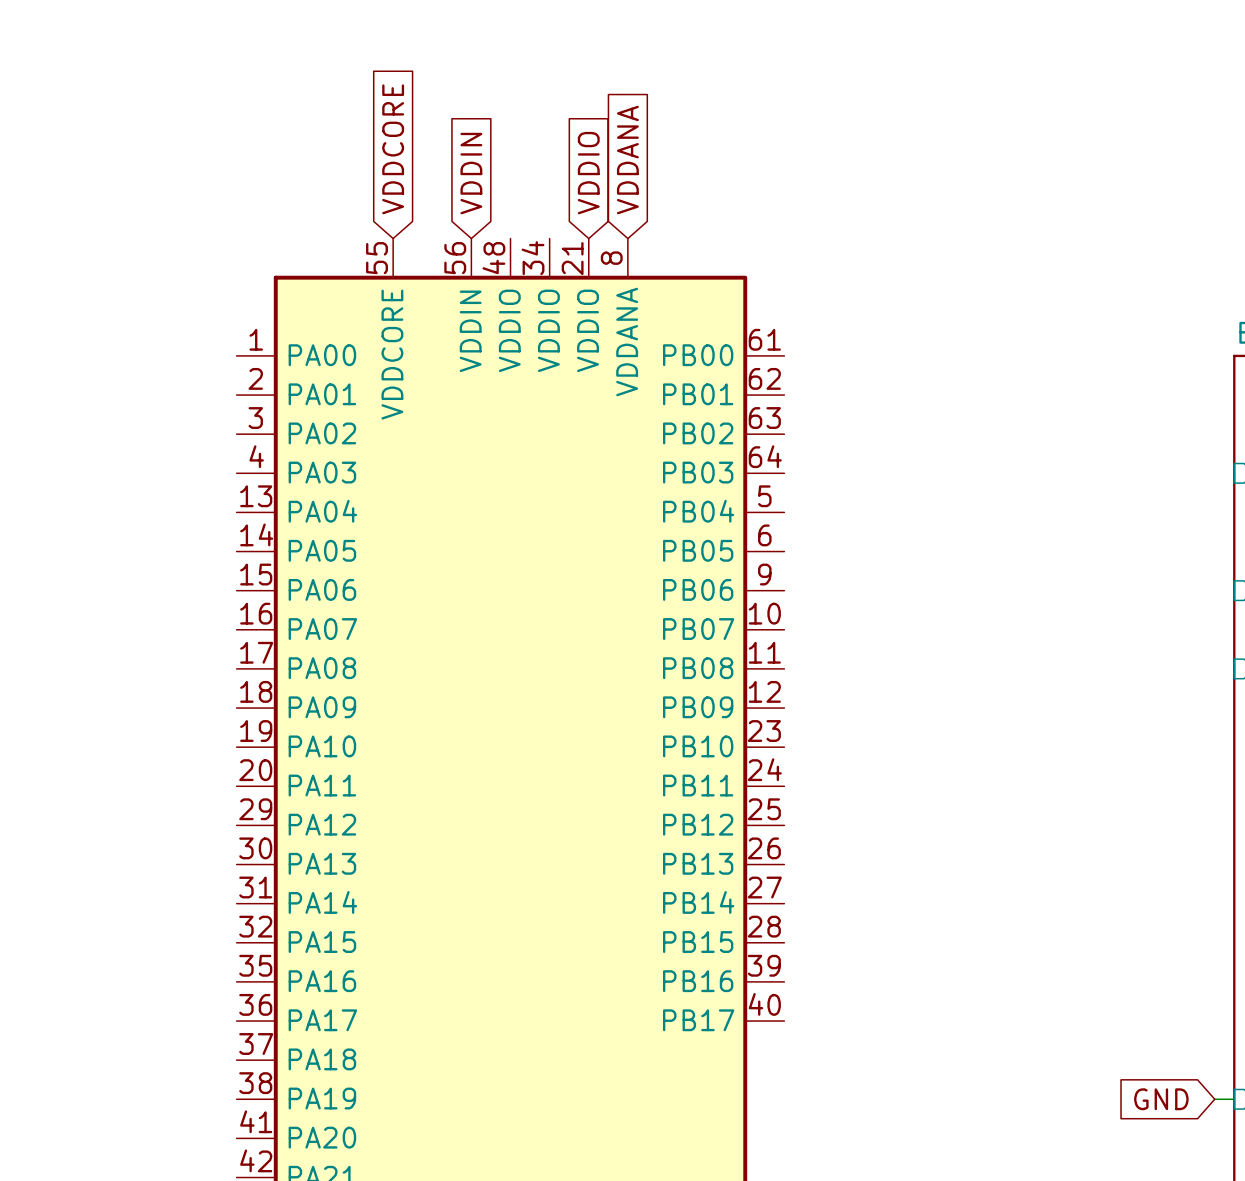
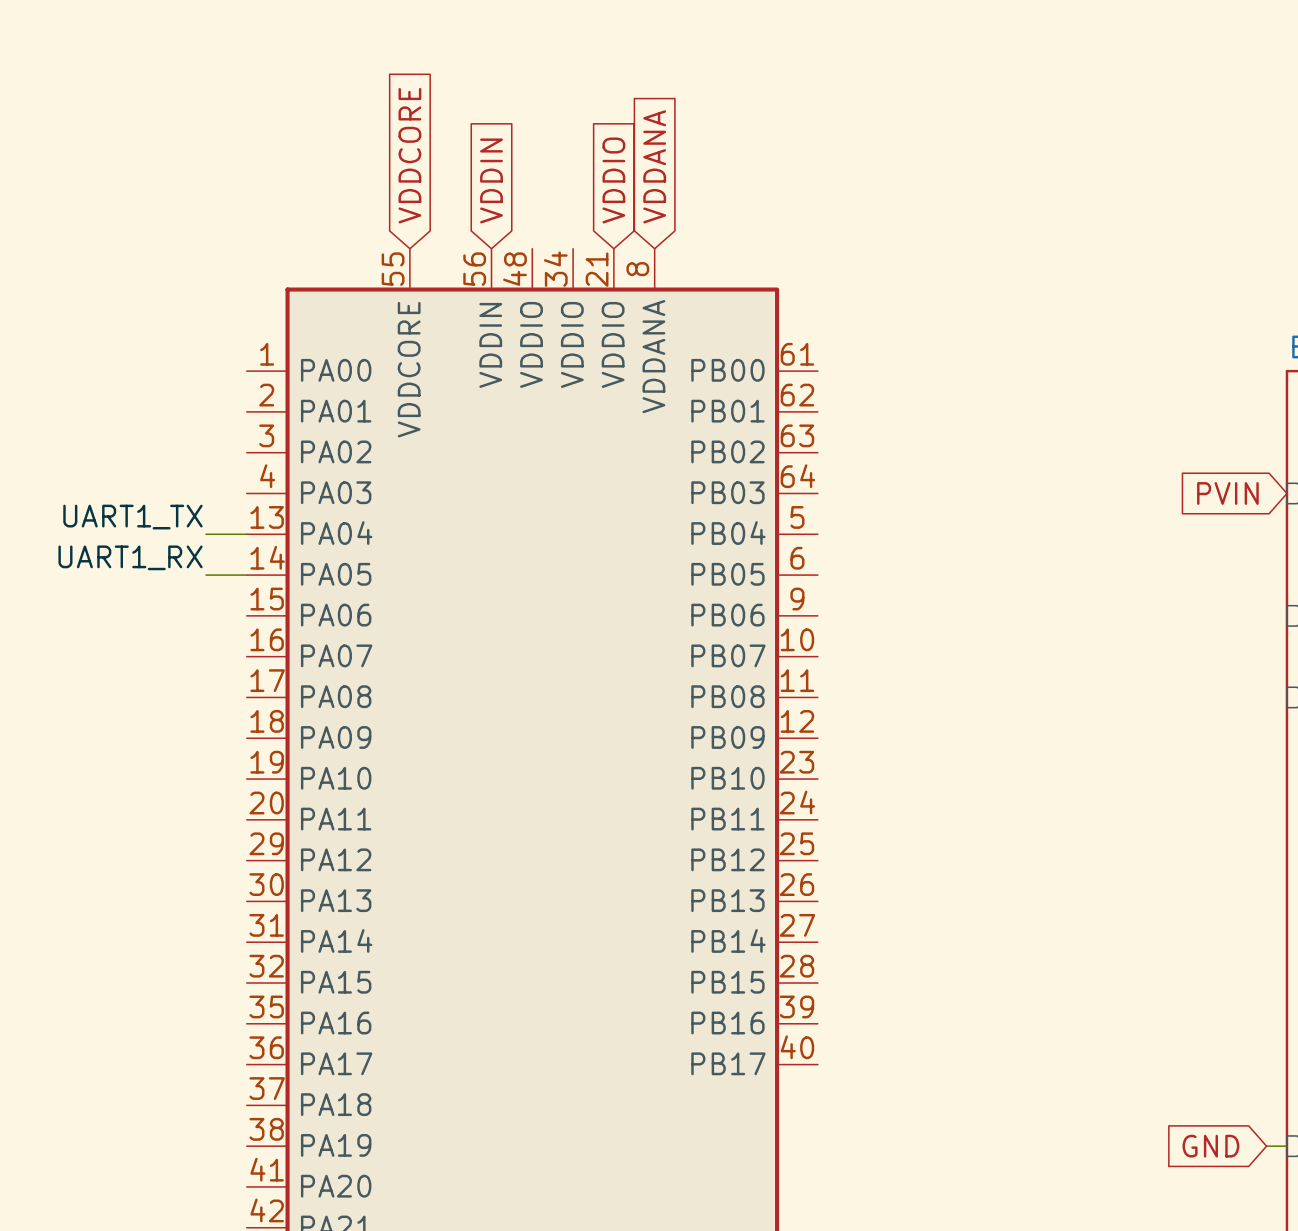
global label: none -> PVIN (1227, 493)
label: none -> UART1_TX (132, 517)
wire: none -> (205, 534) (246, 534)
label: none -> UART1_RX (130, 557)
wire: none -> (205, 575) (246, 575)

